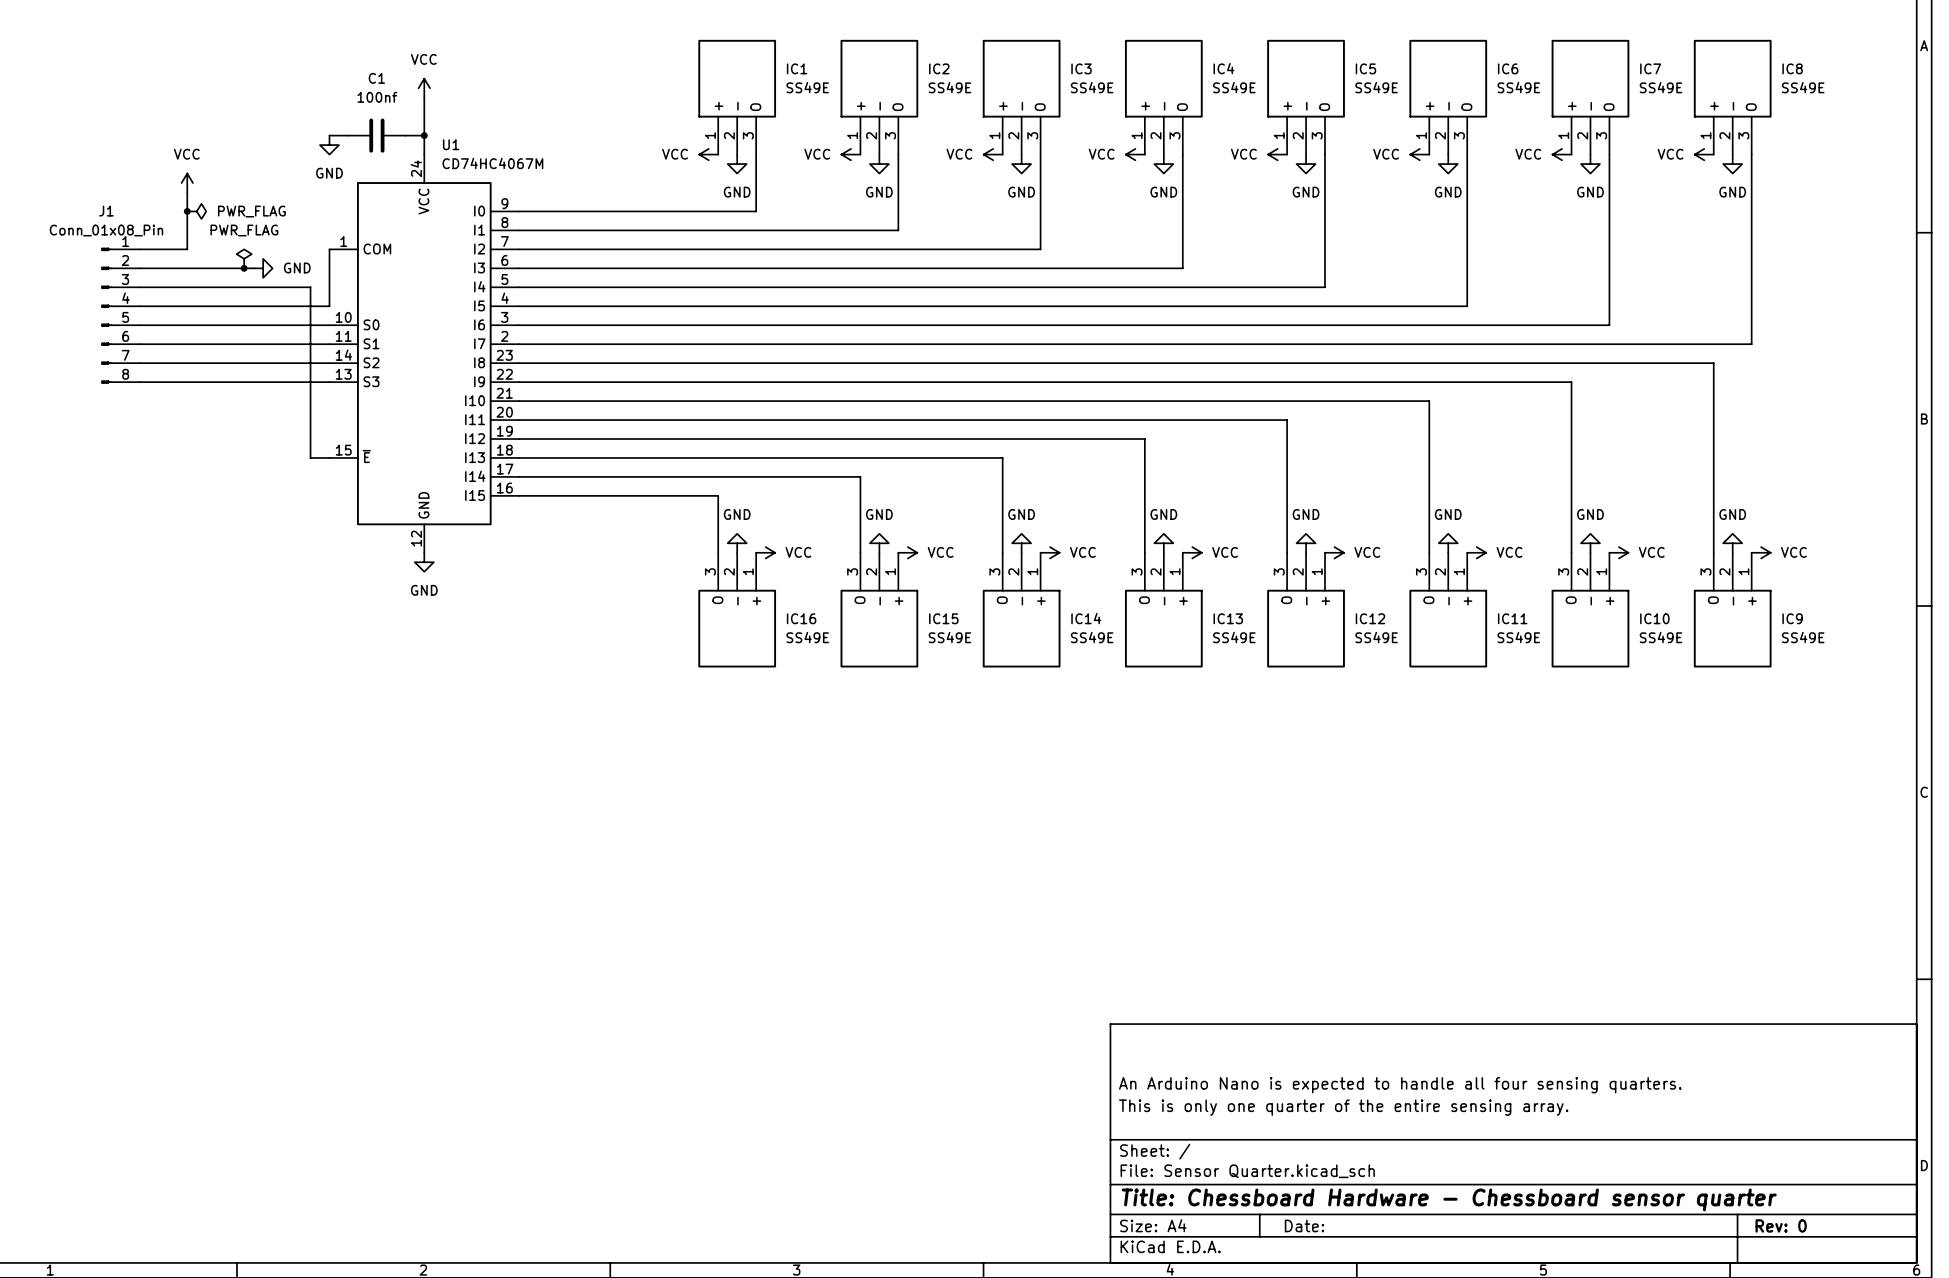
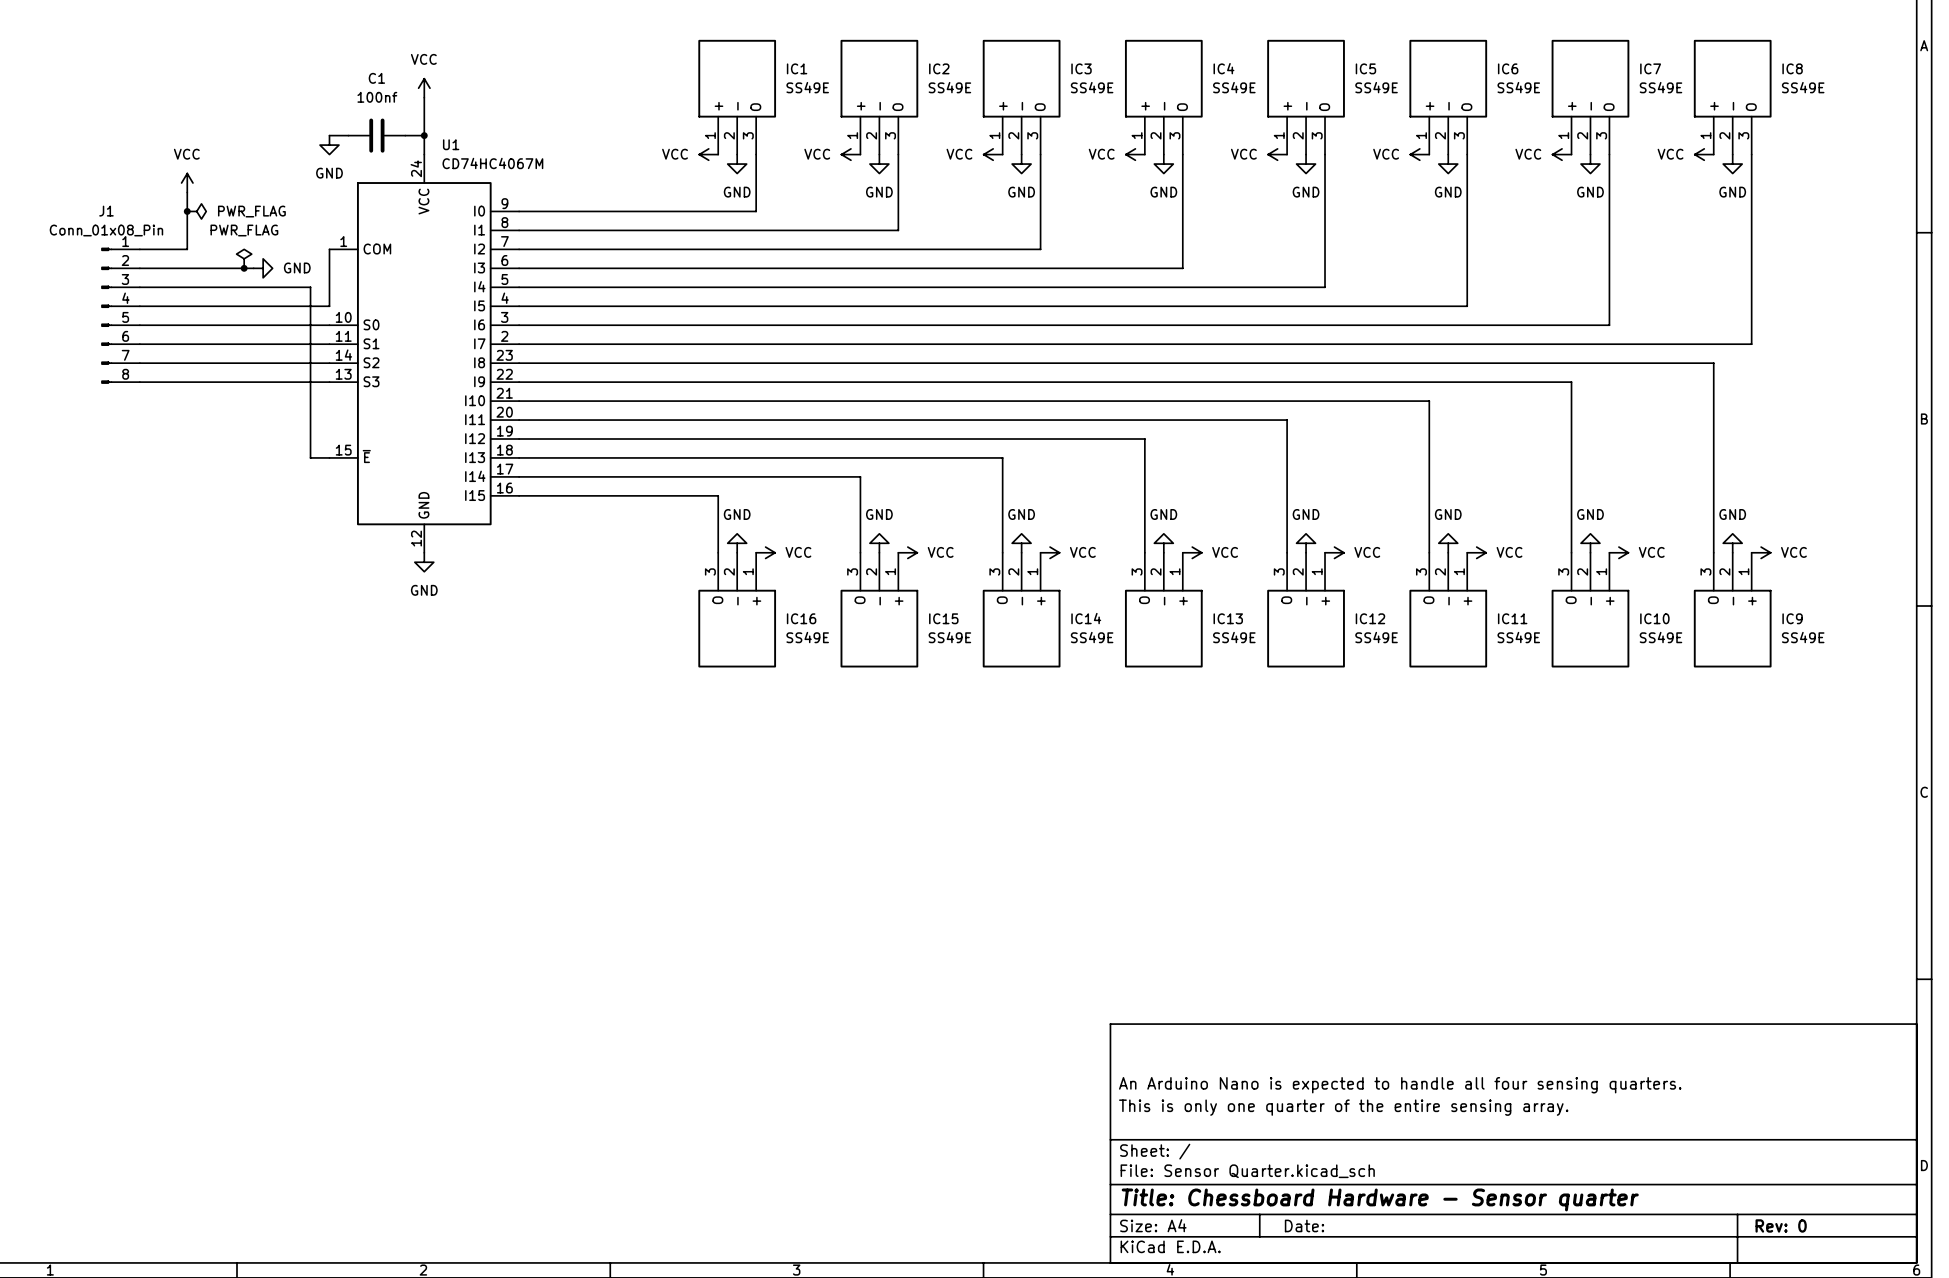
title block: Title: Chessboard Hardware - Chessboard sensor quarter (1449, 1199) -> Title: Chessboard Hardware - Sensor quarter (1380, 1199)

